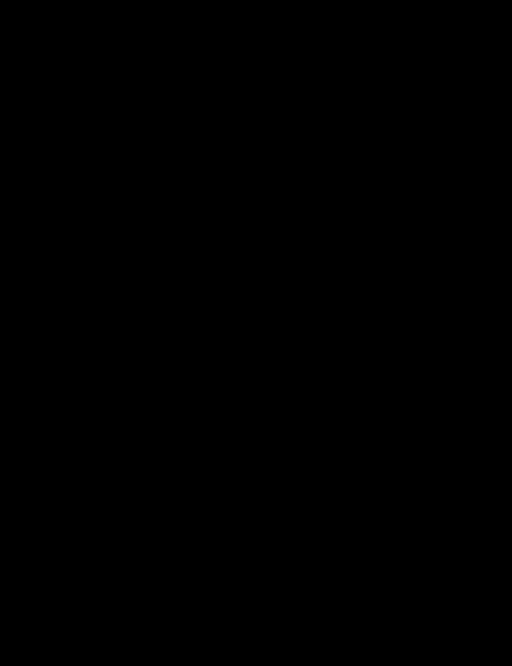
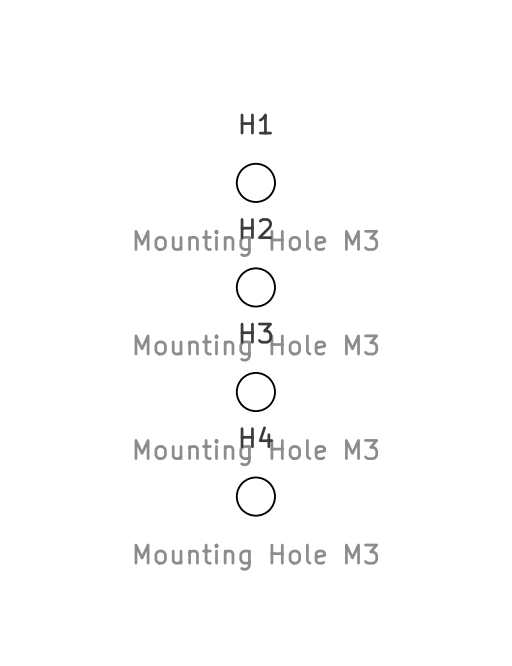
H1: none -> Mounting Hole M3 (255, 182)
H2: none -> Mounting Hole M3 (255, 287)
H3: none -> Mounting Hole M3 (255, 392)
H4: none -> Mounting Hole M3 (255, 496)

